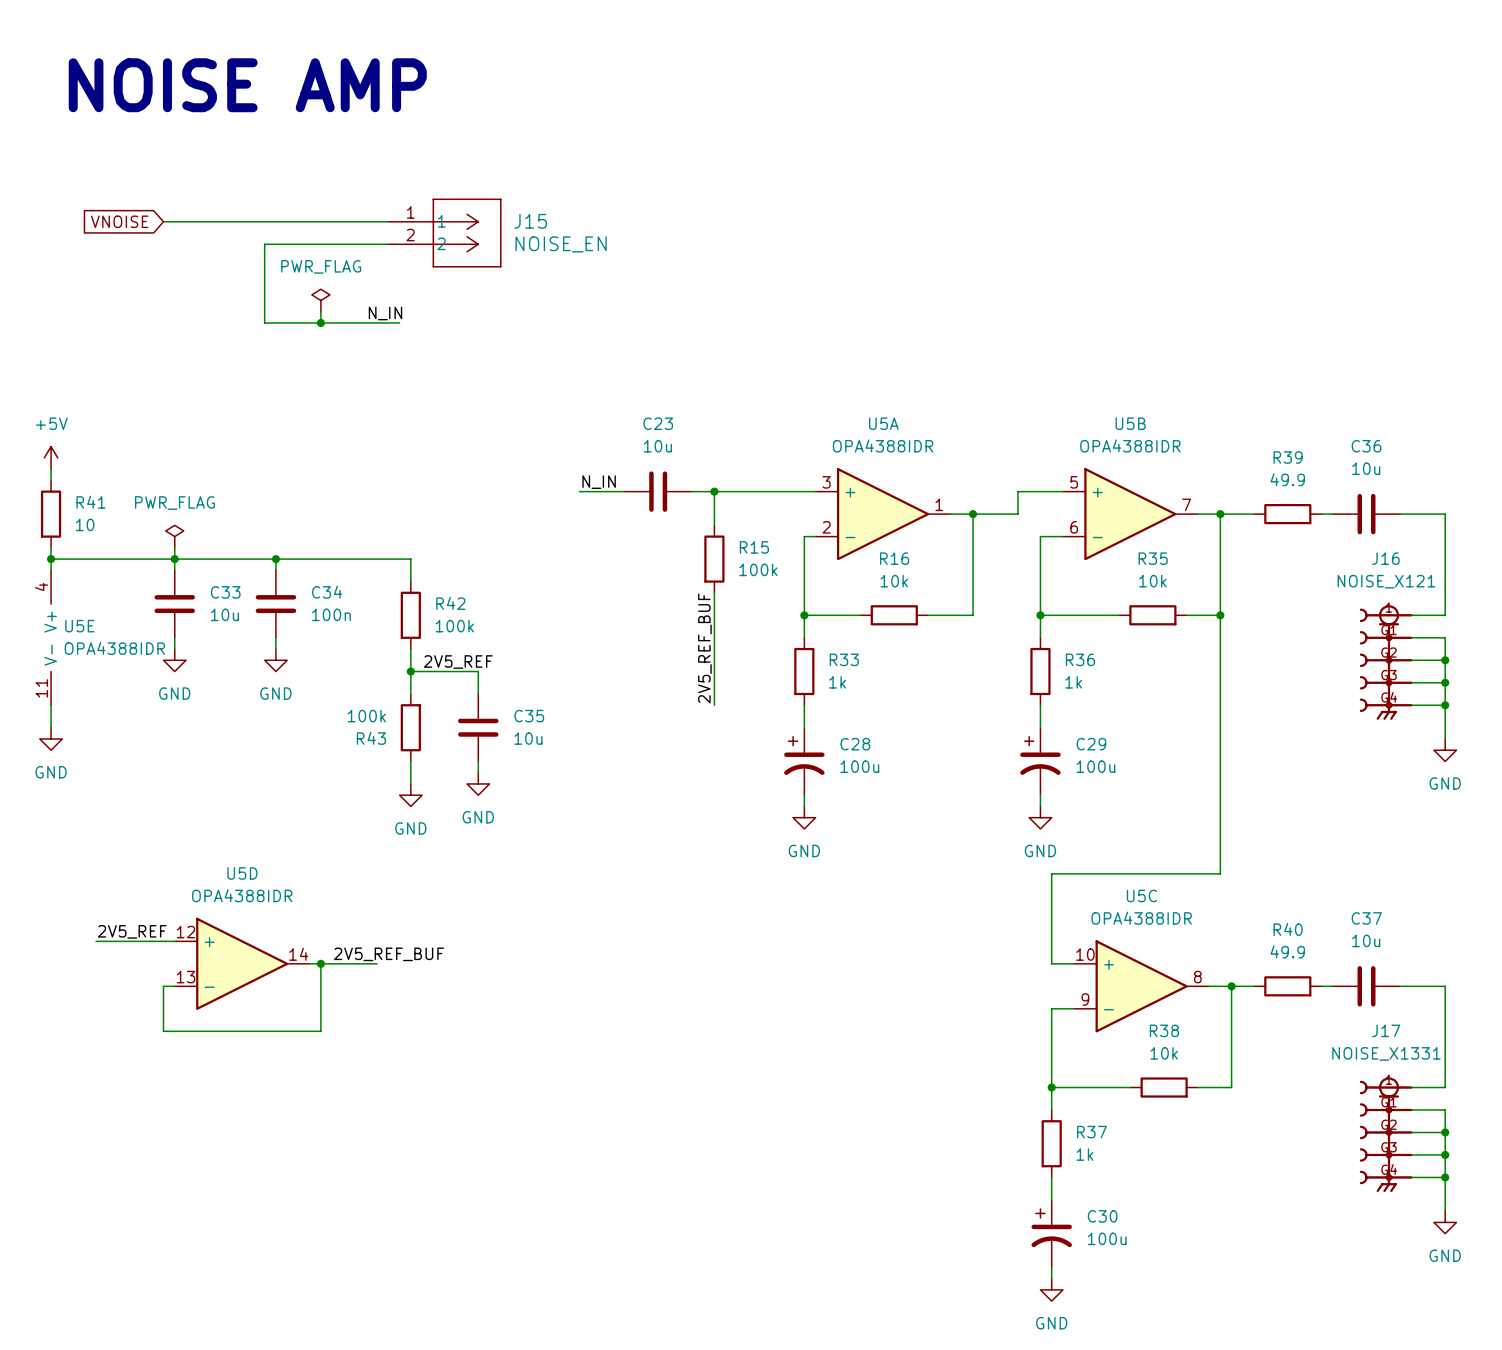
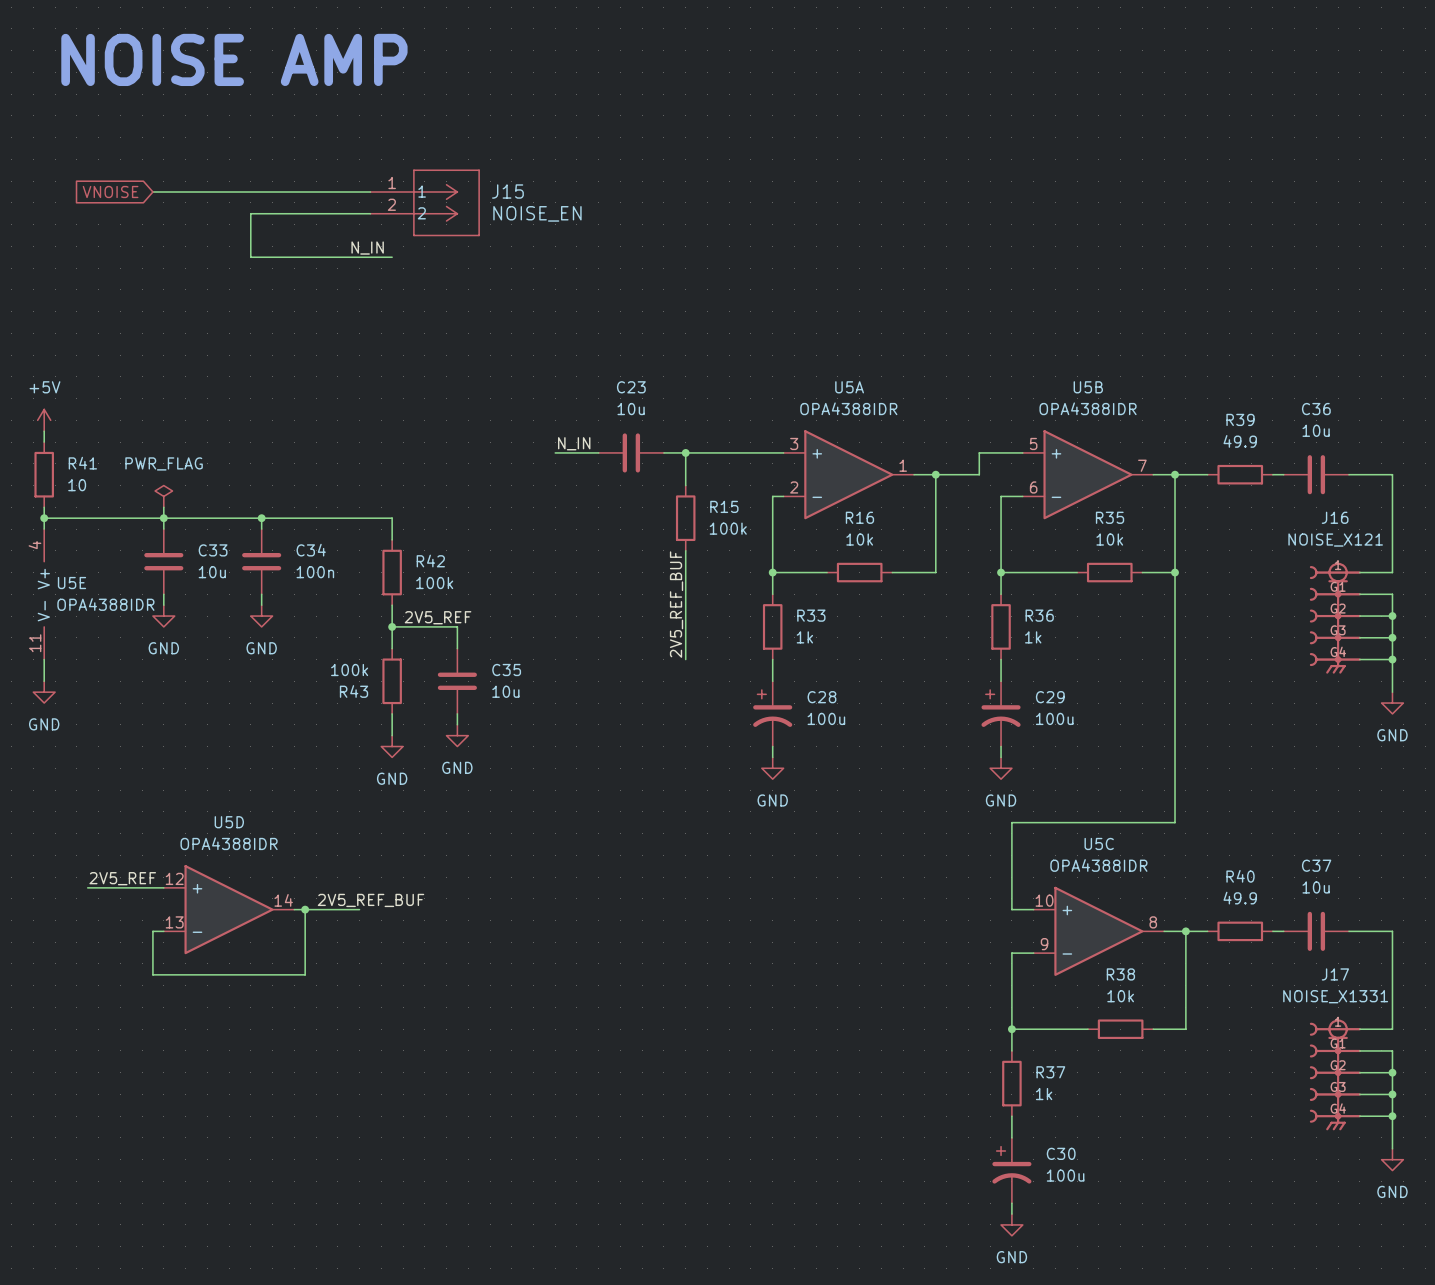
wire: (264, 289) (264, 322) (399, 322) -> (250, 257) (392, 257)
power symbol: PWR_FLAG (320, 300) -> none
wire: (320, 311) (320, 322) -> none
label position: N_IN (385, 313) -> N_IN (367, 248)
junction: (320, 322) -> none

